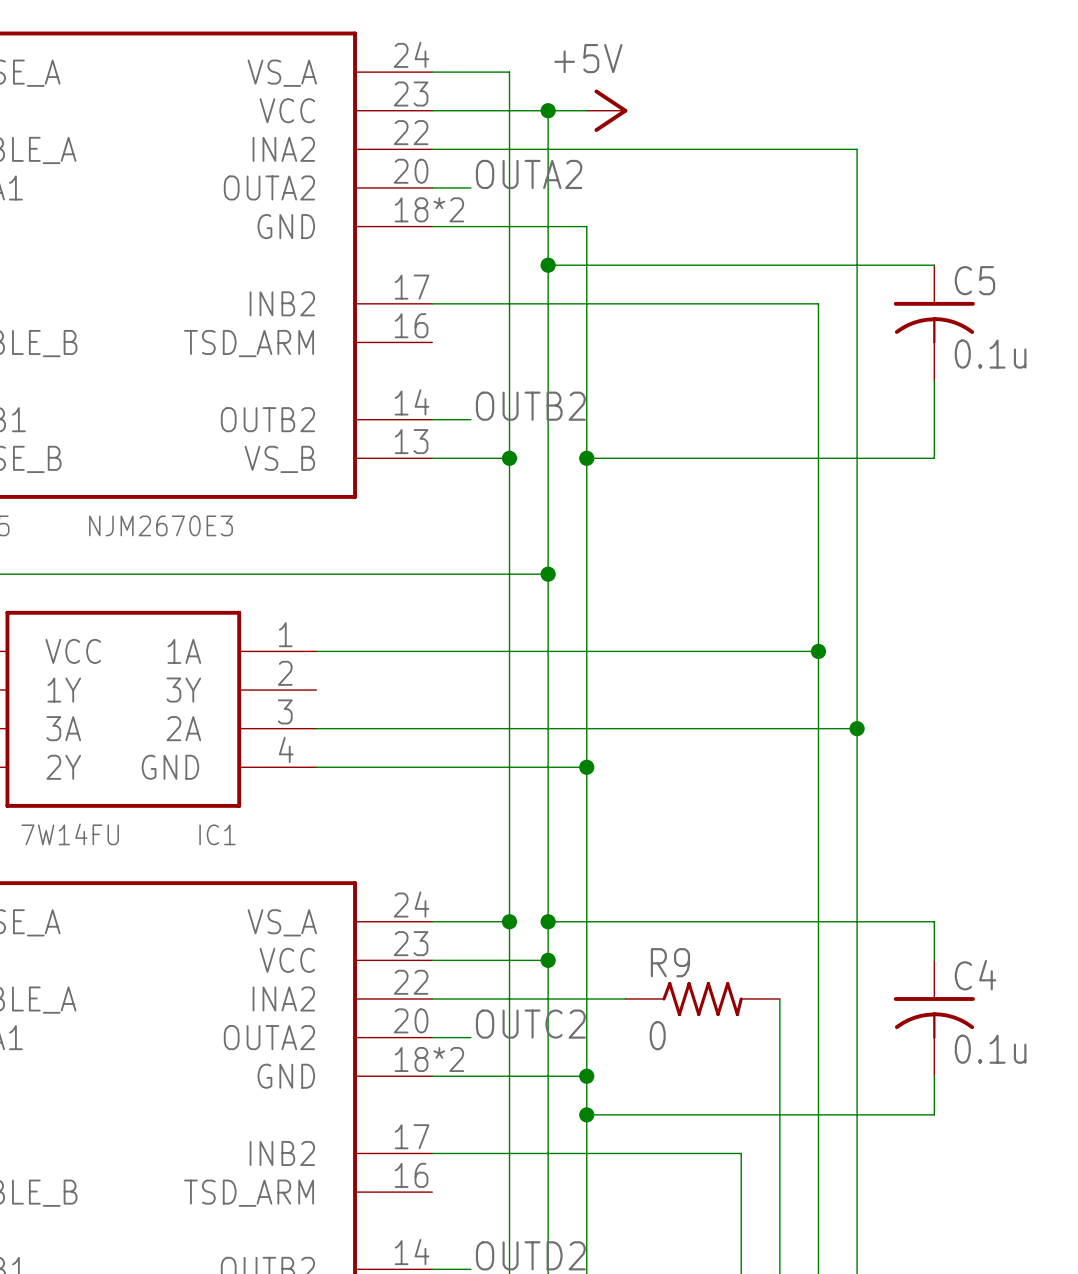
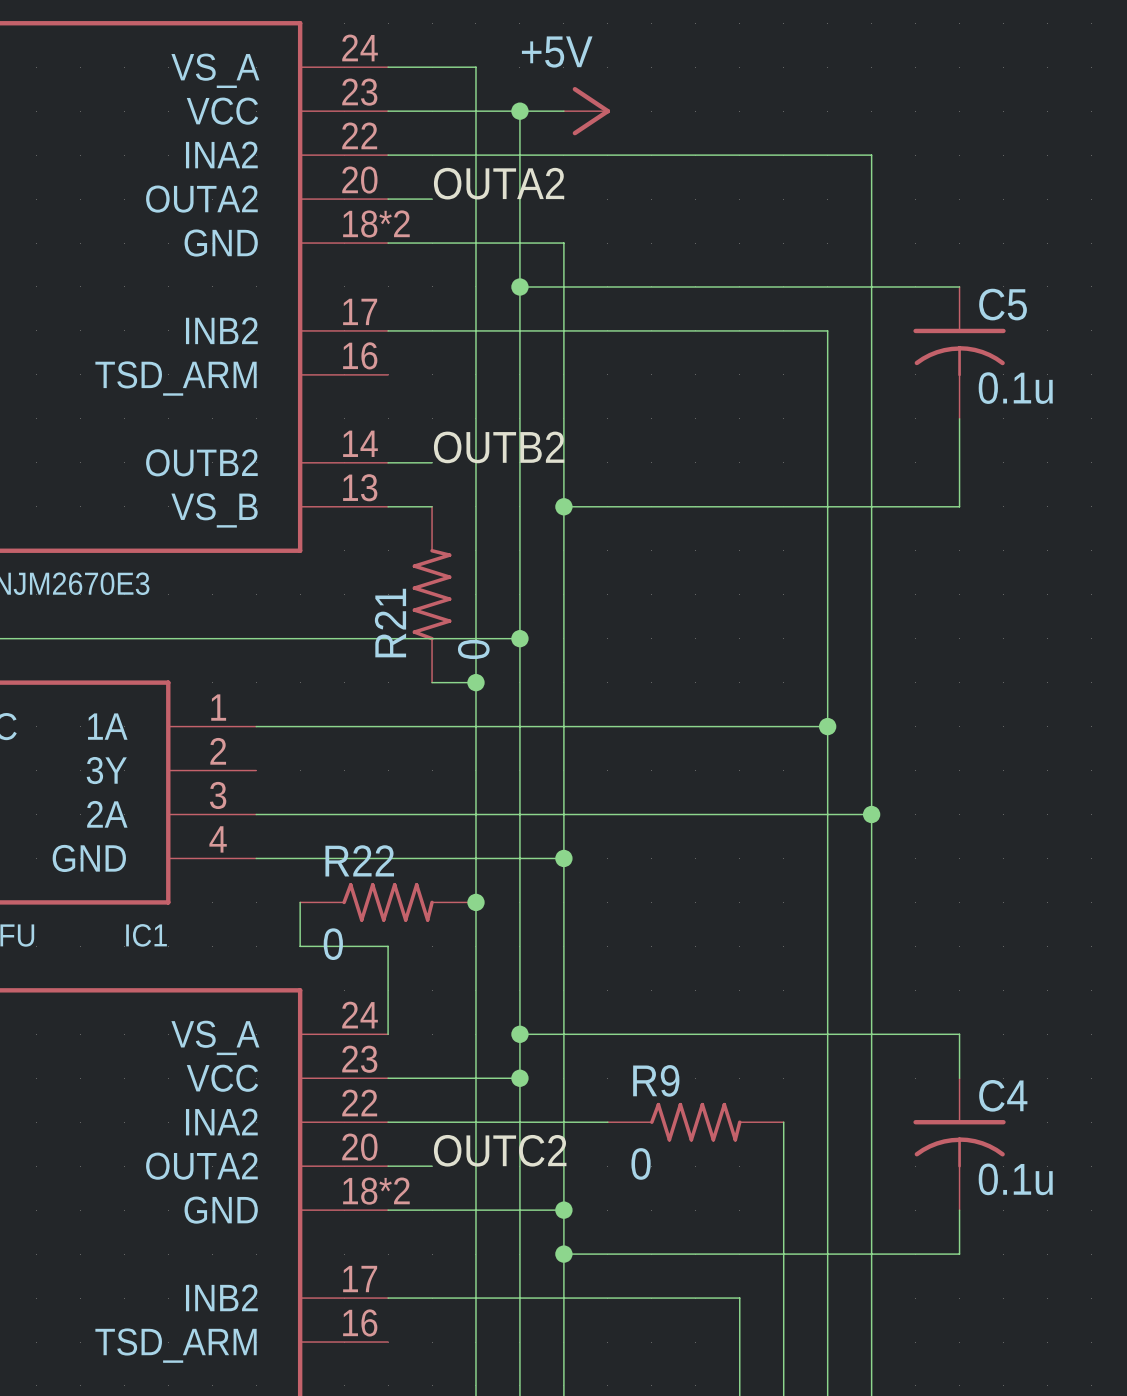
wire: (470, 458) (509, 458) -> (432, 682) (475, 682)
junction: (509, 458) -> none
R21: none -> 0 (432, 594)
junction: none -> (475, 682)
R22: none -> 0 (388, 902)
junction: none -> (475, 902)
wire: (432, 921) (509, 921) -> (388, 1034) (388, 946) (300, 946) (300, 902)
junction: (509, 921) -> none

